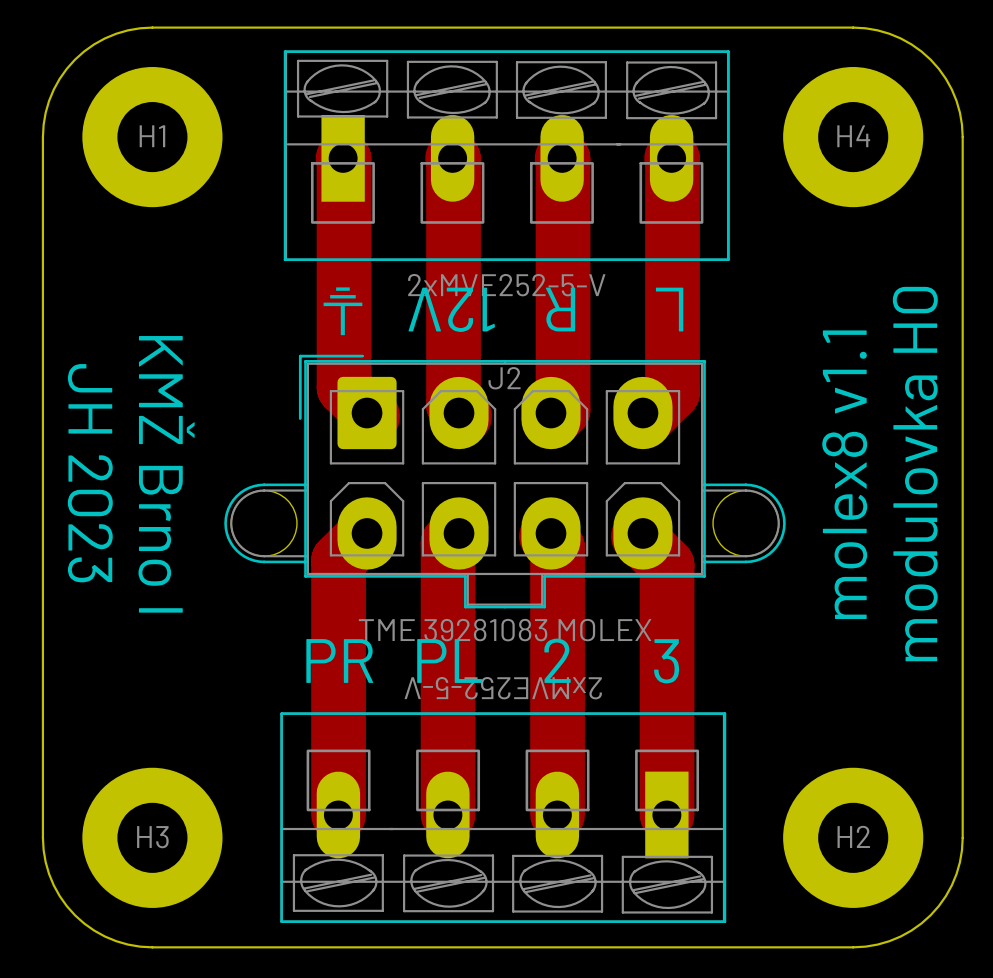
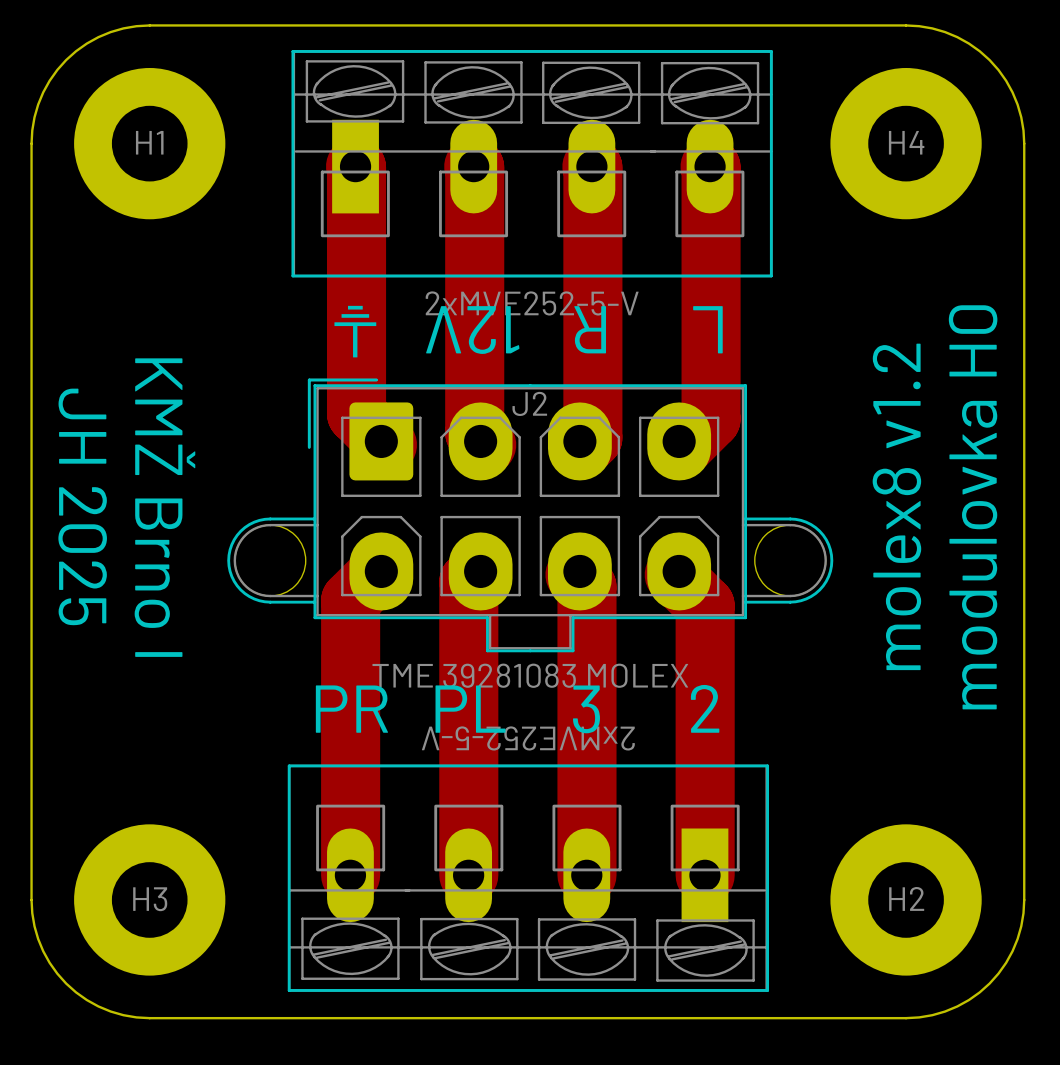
text: JH 2023 (90, 473) -> JH 2025 (82, 506)
text: molex8 v1.1 (844, 474) -> molex8 v1.2 (896, 506)
text: 2 (557, 660) -> 3 (586, 709)
text: 3 (666, 661) -> 2 (705, 708)

